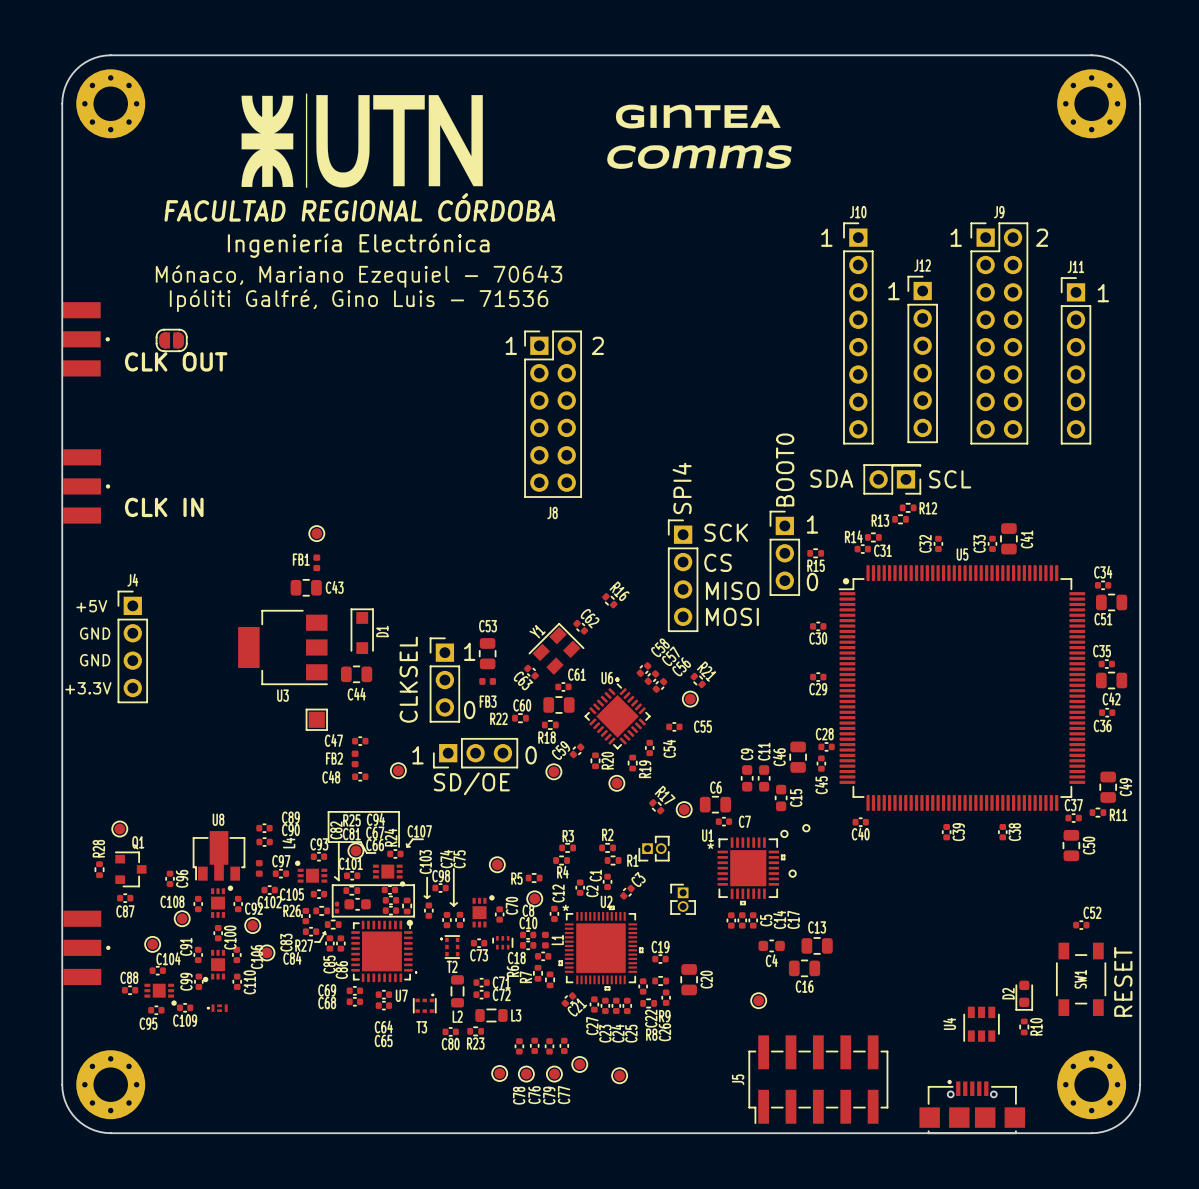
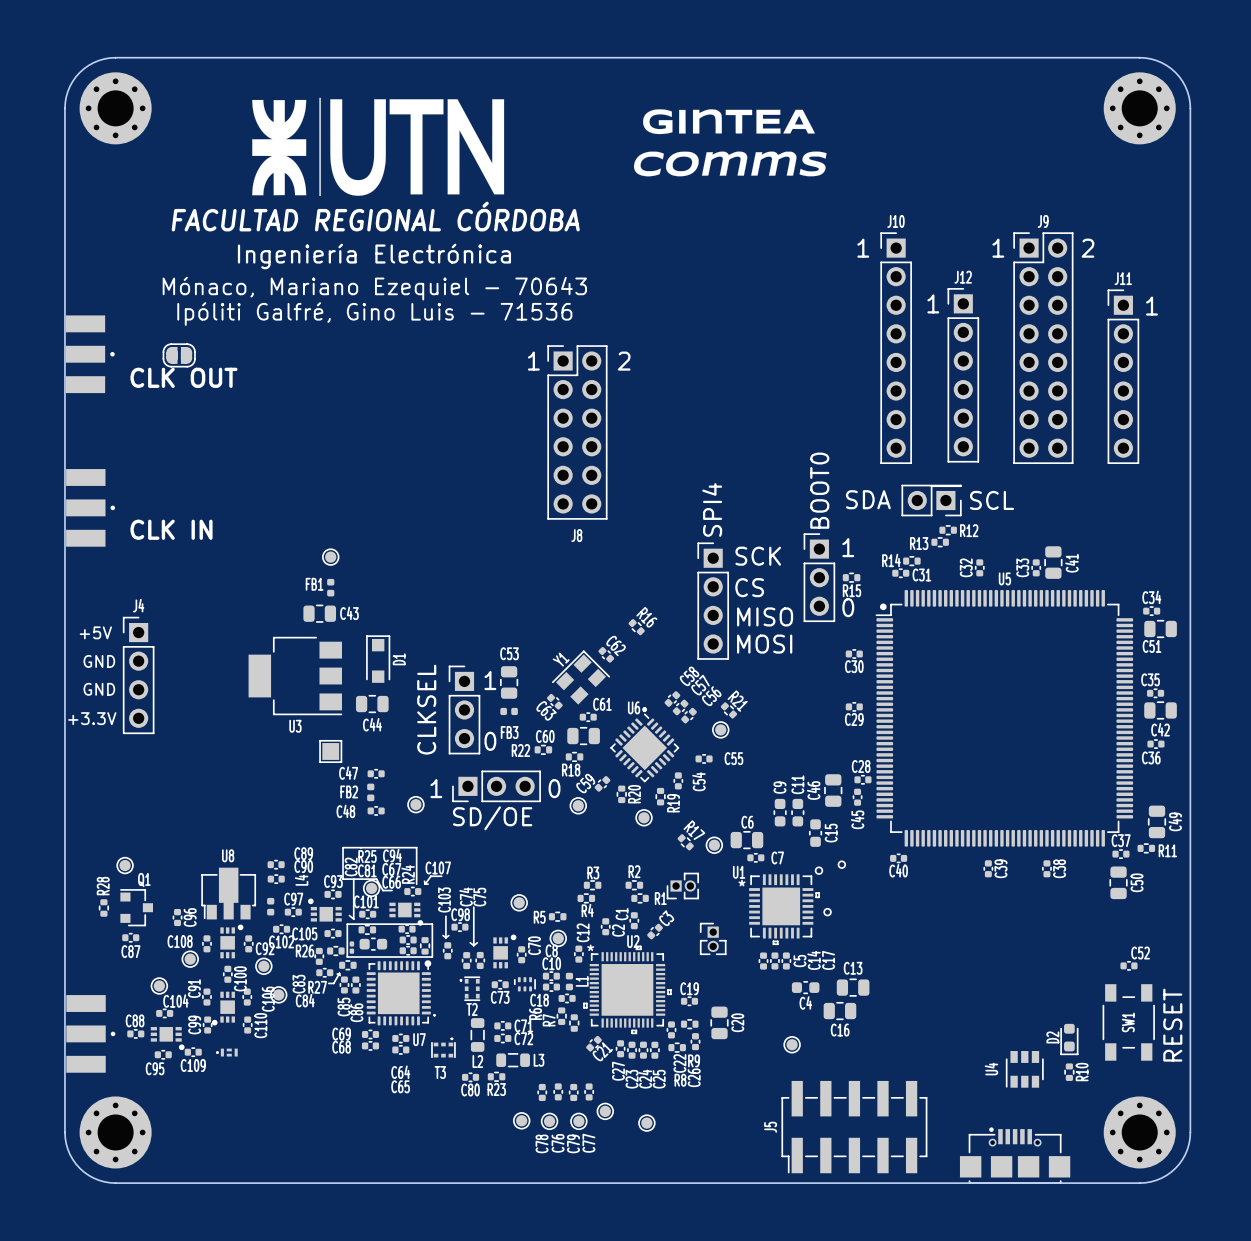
part position: (86, 947) -> (90, 1033)

